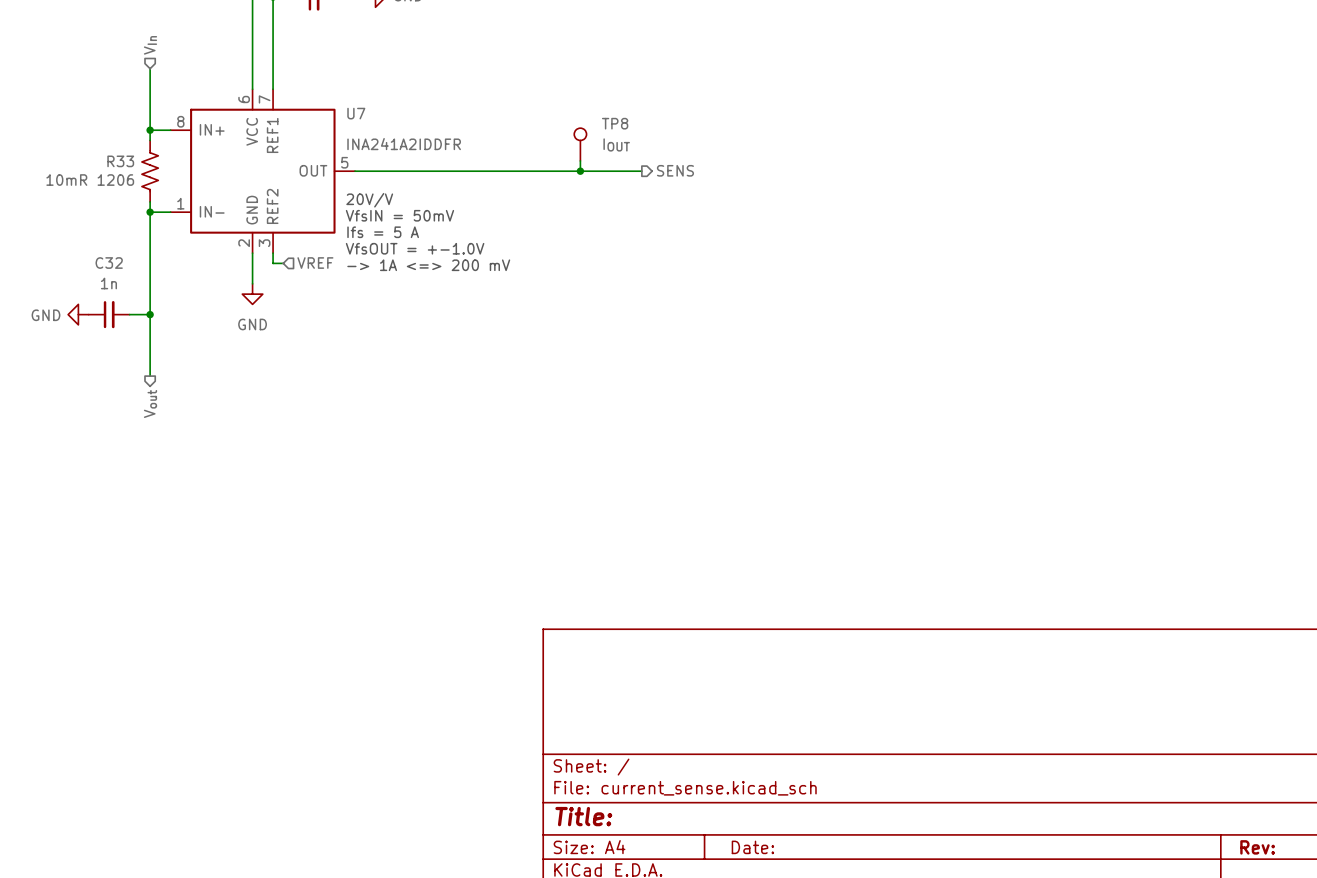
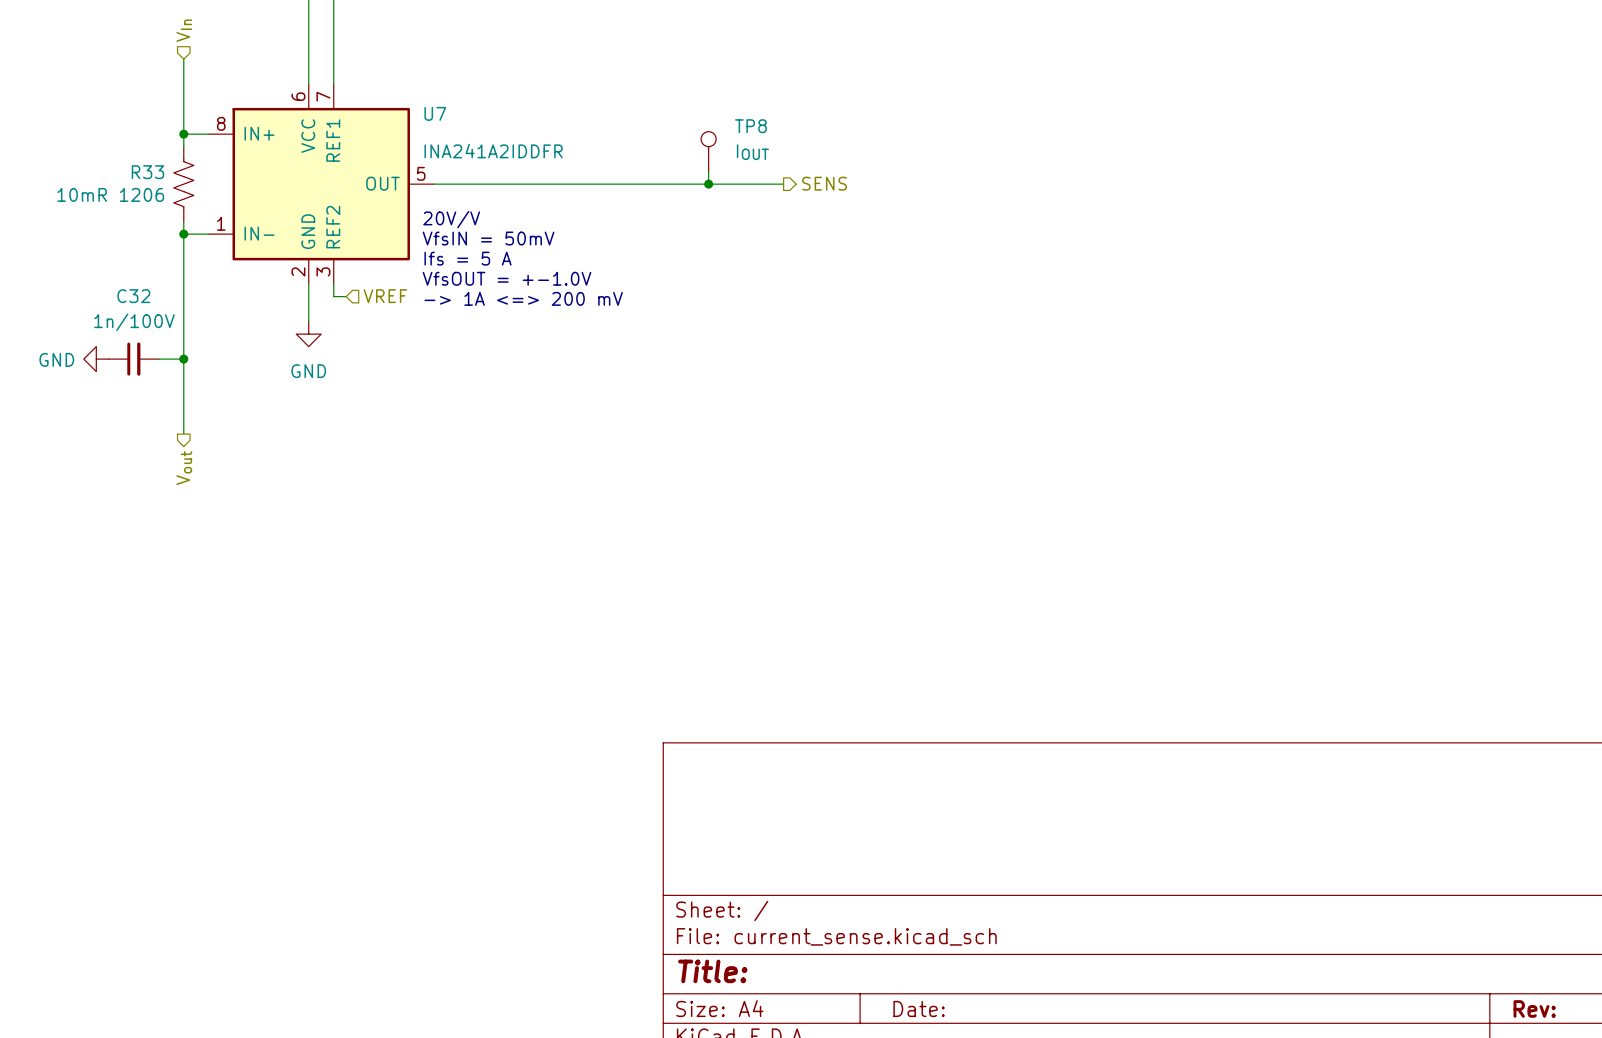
C32 value: 1n (108, 283) -> 1n/100V (134, 322)

